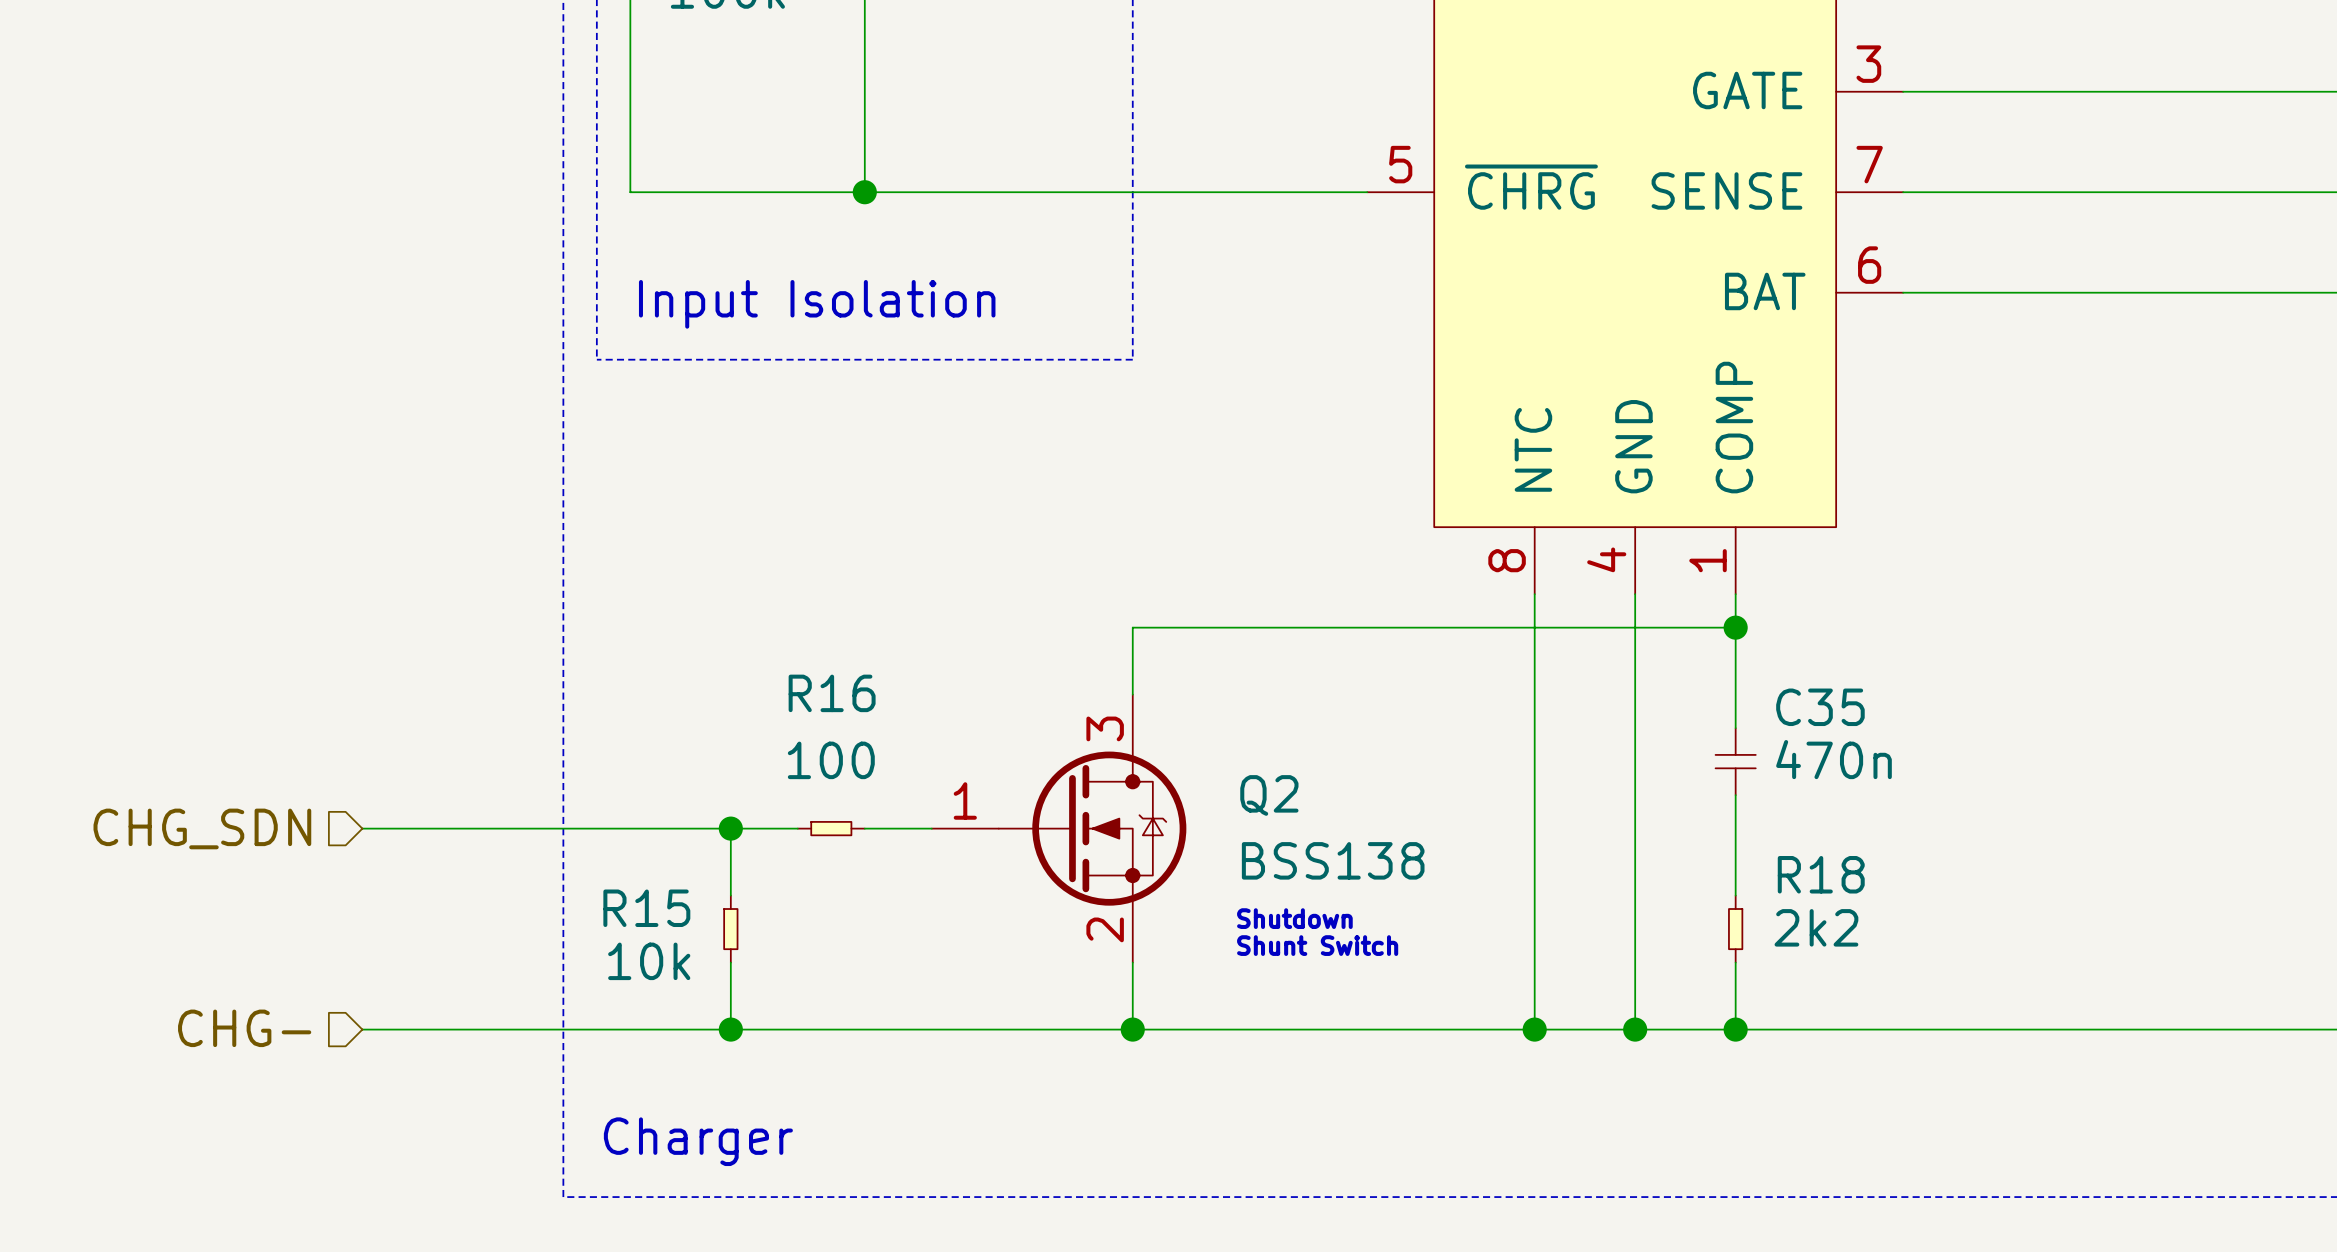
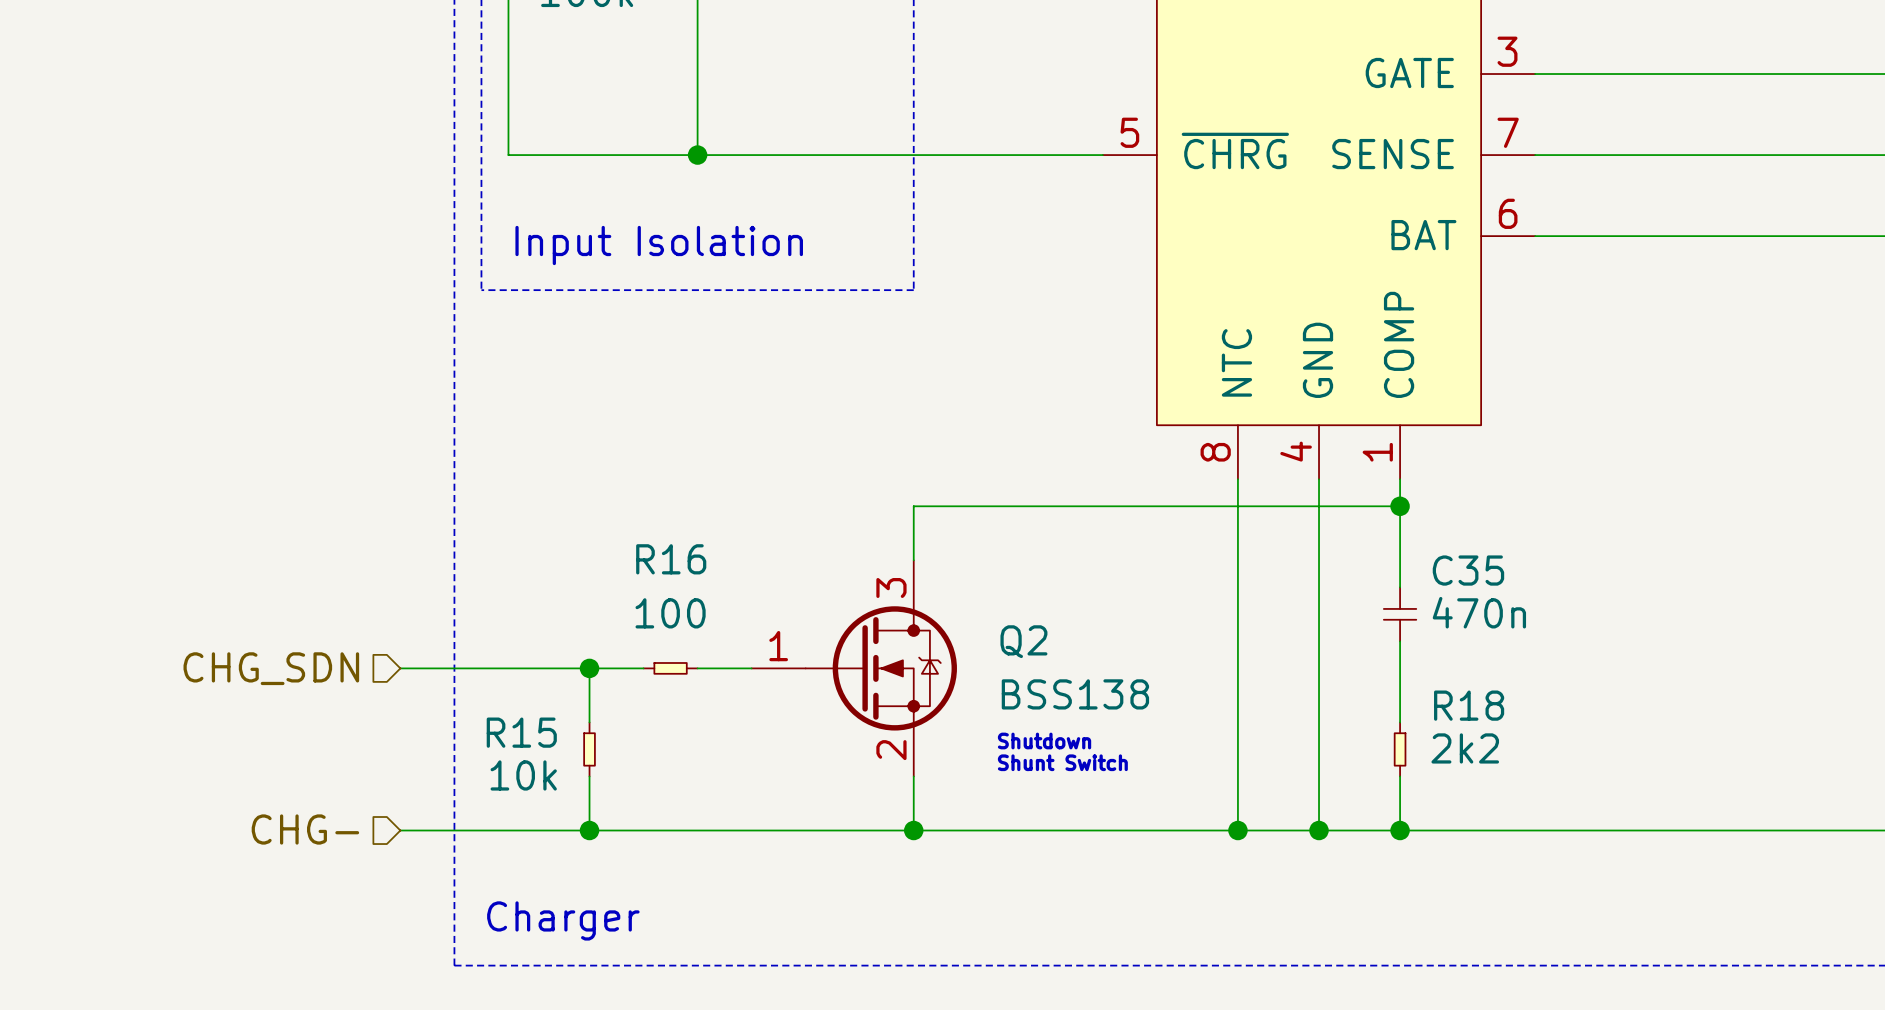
hierarchical label position: CHG_SDN (202, 828) -> CHG_SDN (271, 668)
wire: (362, 828) (496, 828) -> none
hierarchical label position: CHG- (244, 1028) -> CHG- (305, 829)
wire: (362, 1029) (496, 1029) -> none

